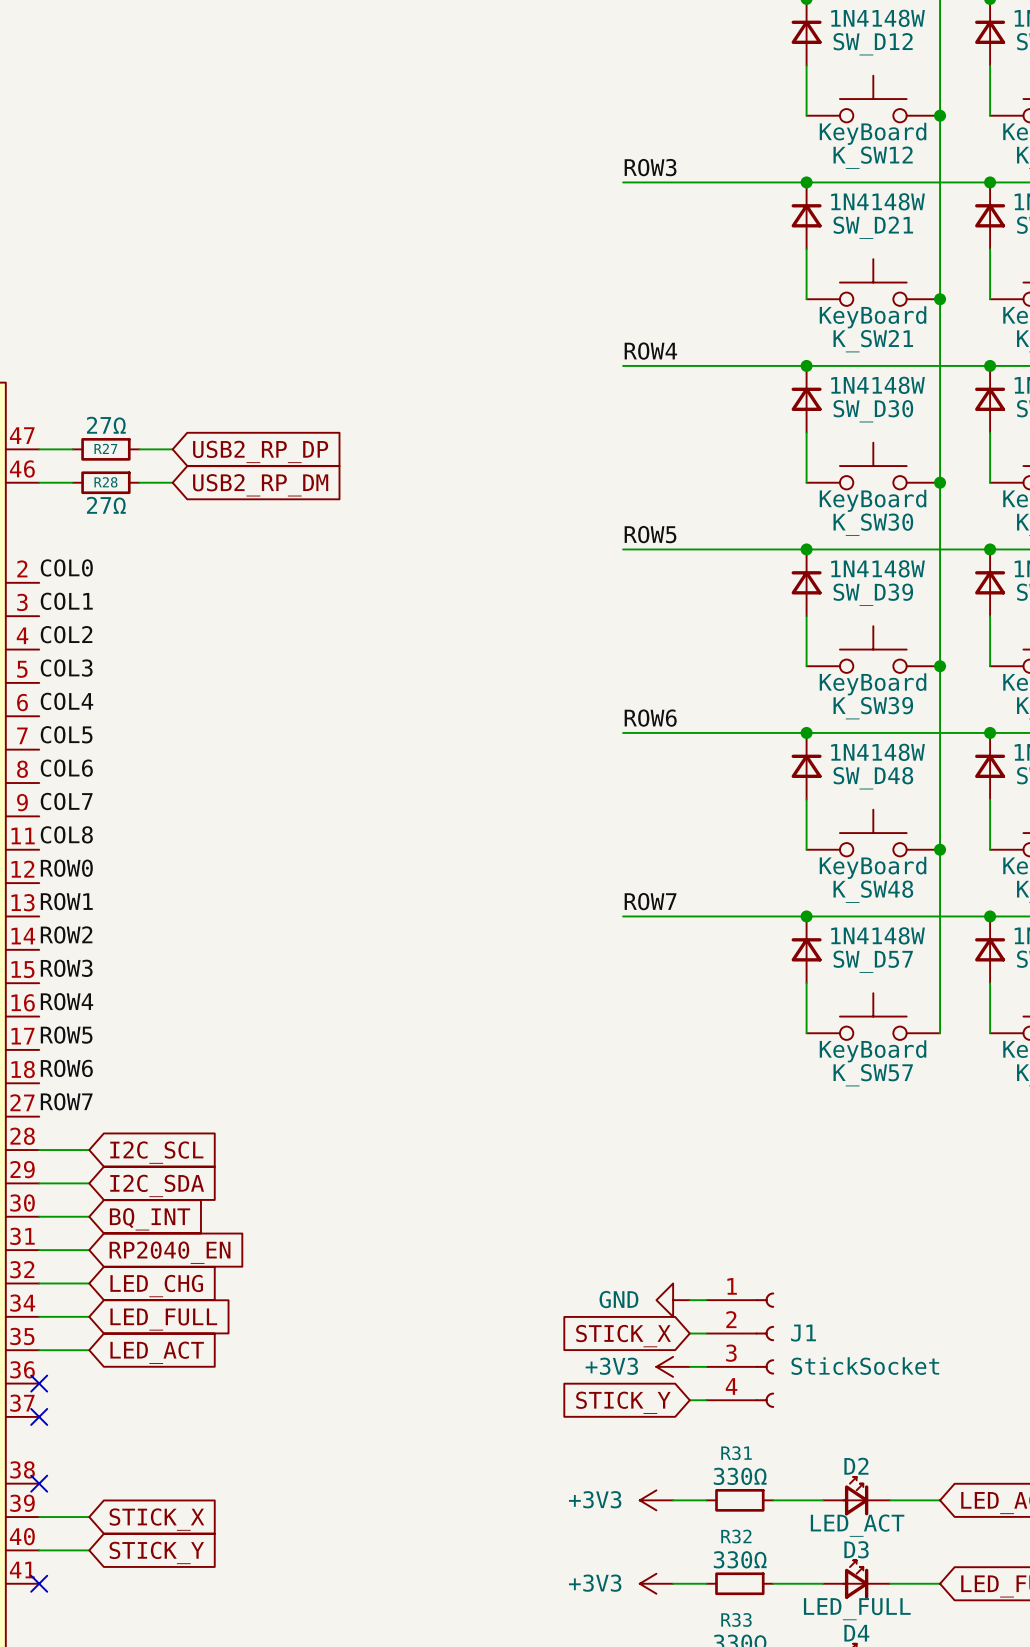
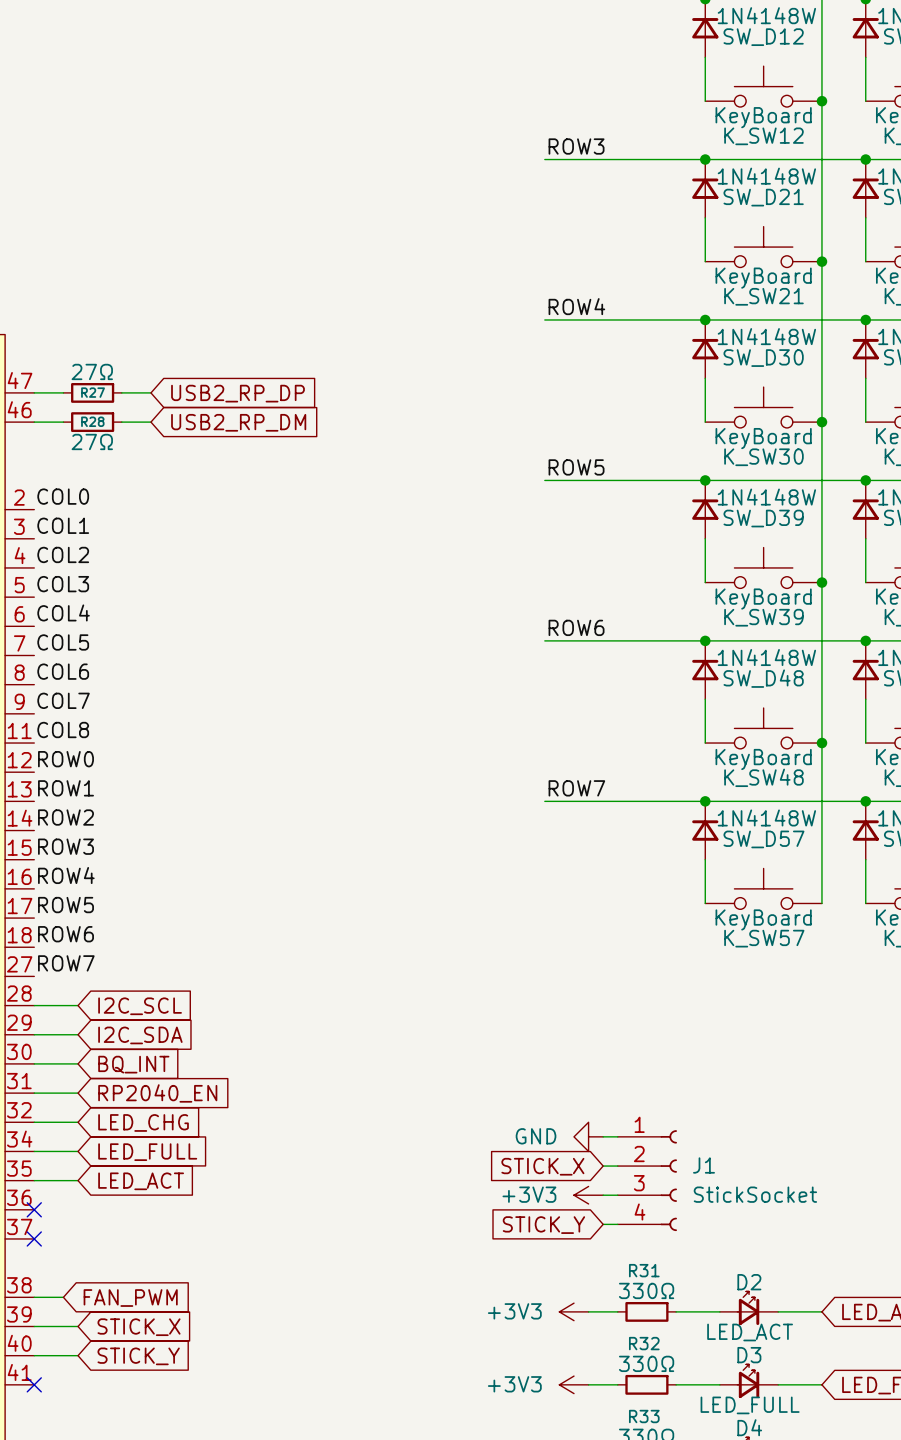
wire: none -> (34, 1297) (63, 1297)
no-connect mark: (39, 1483) -> none
global label: none -> FAN_PWM (130, 1298)

